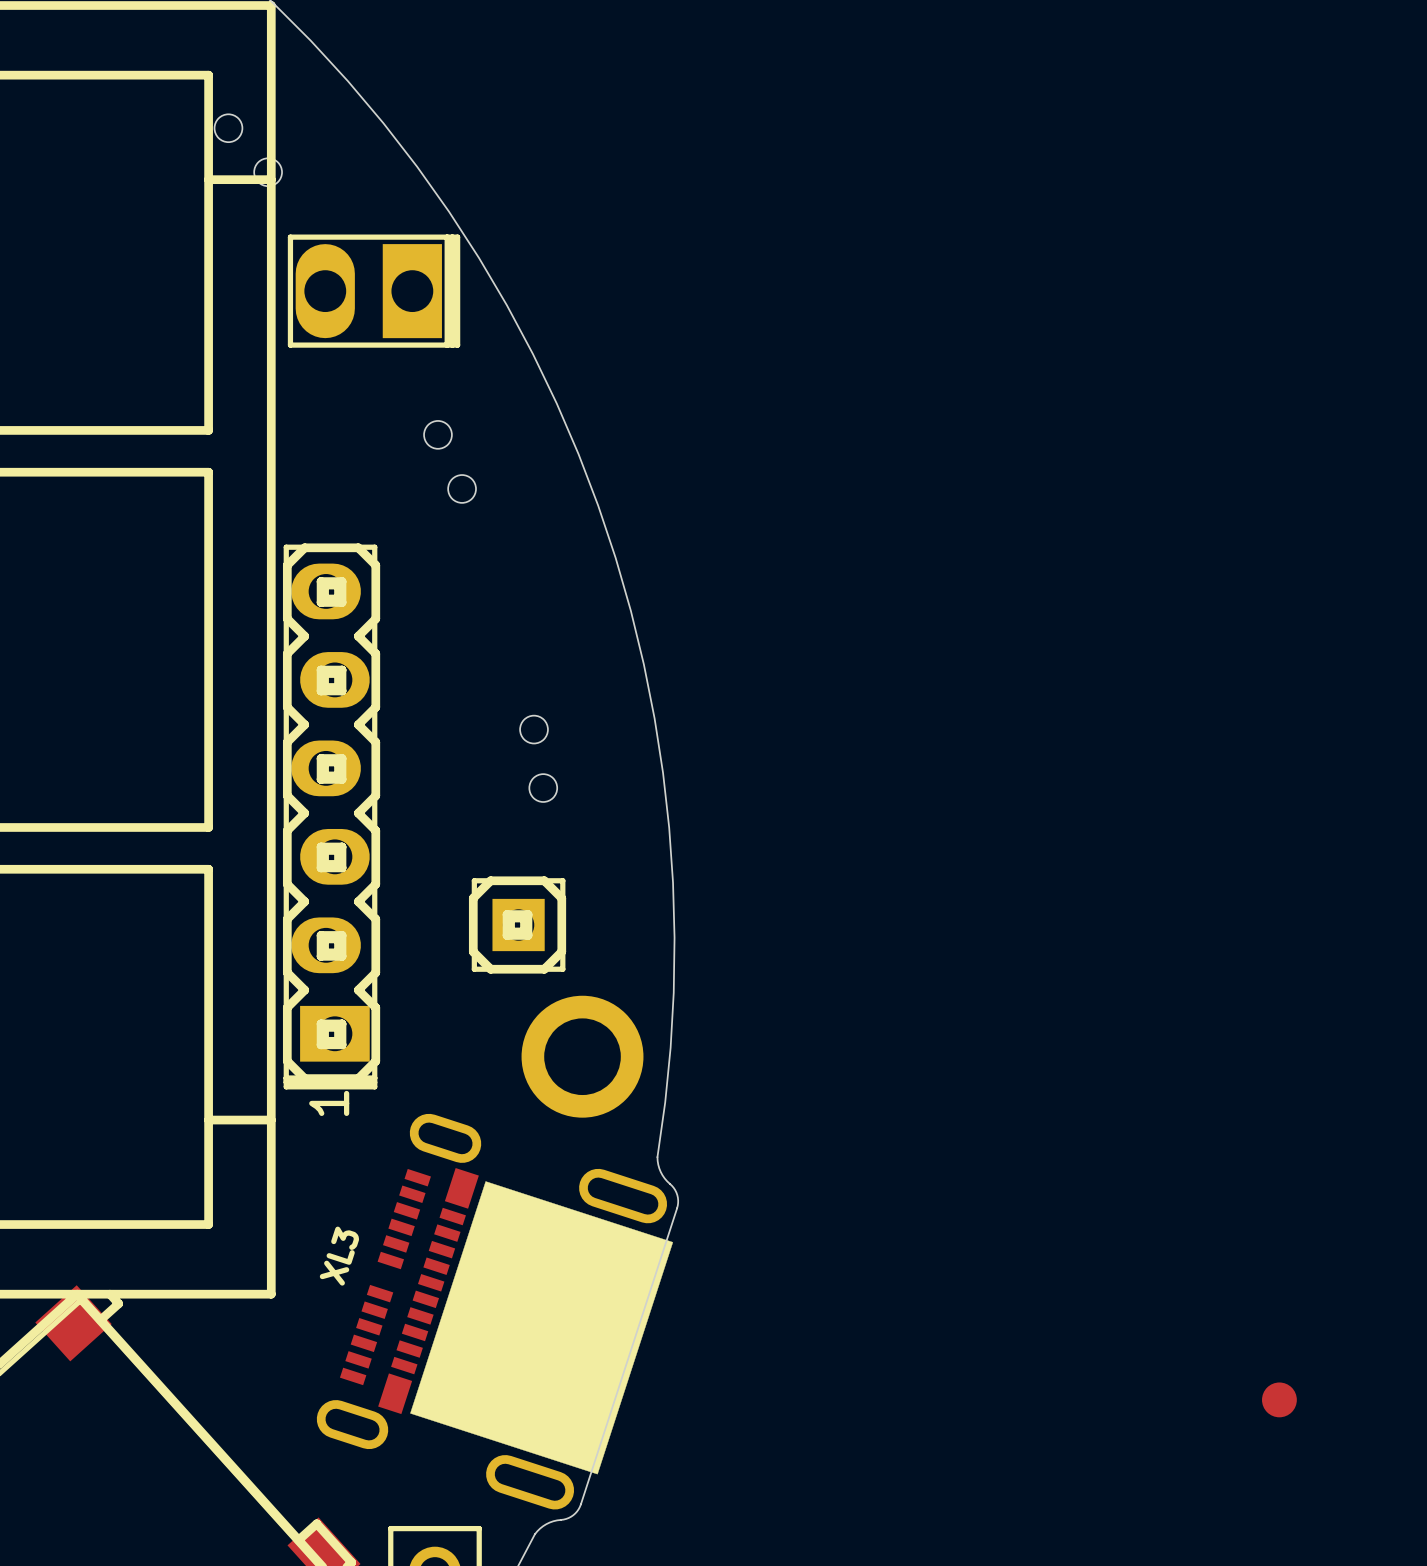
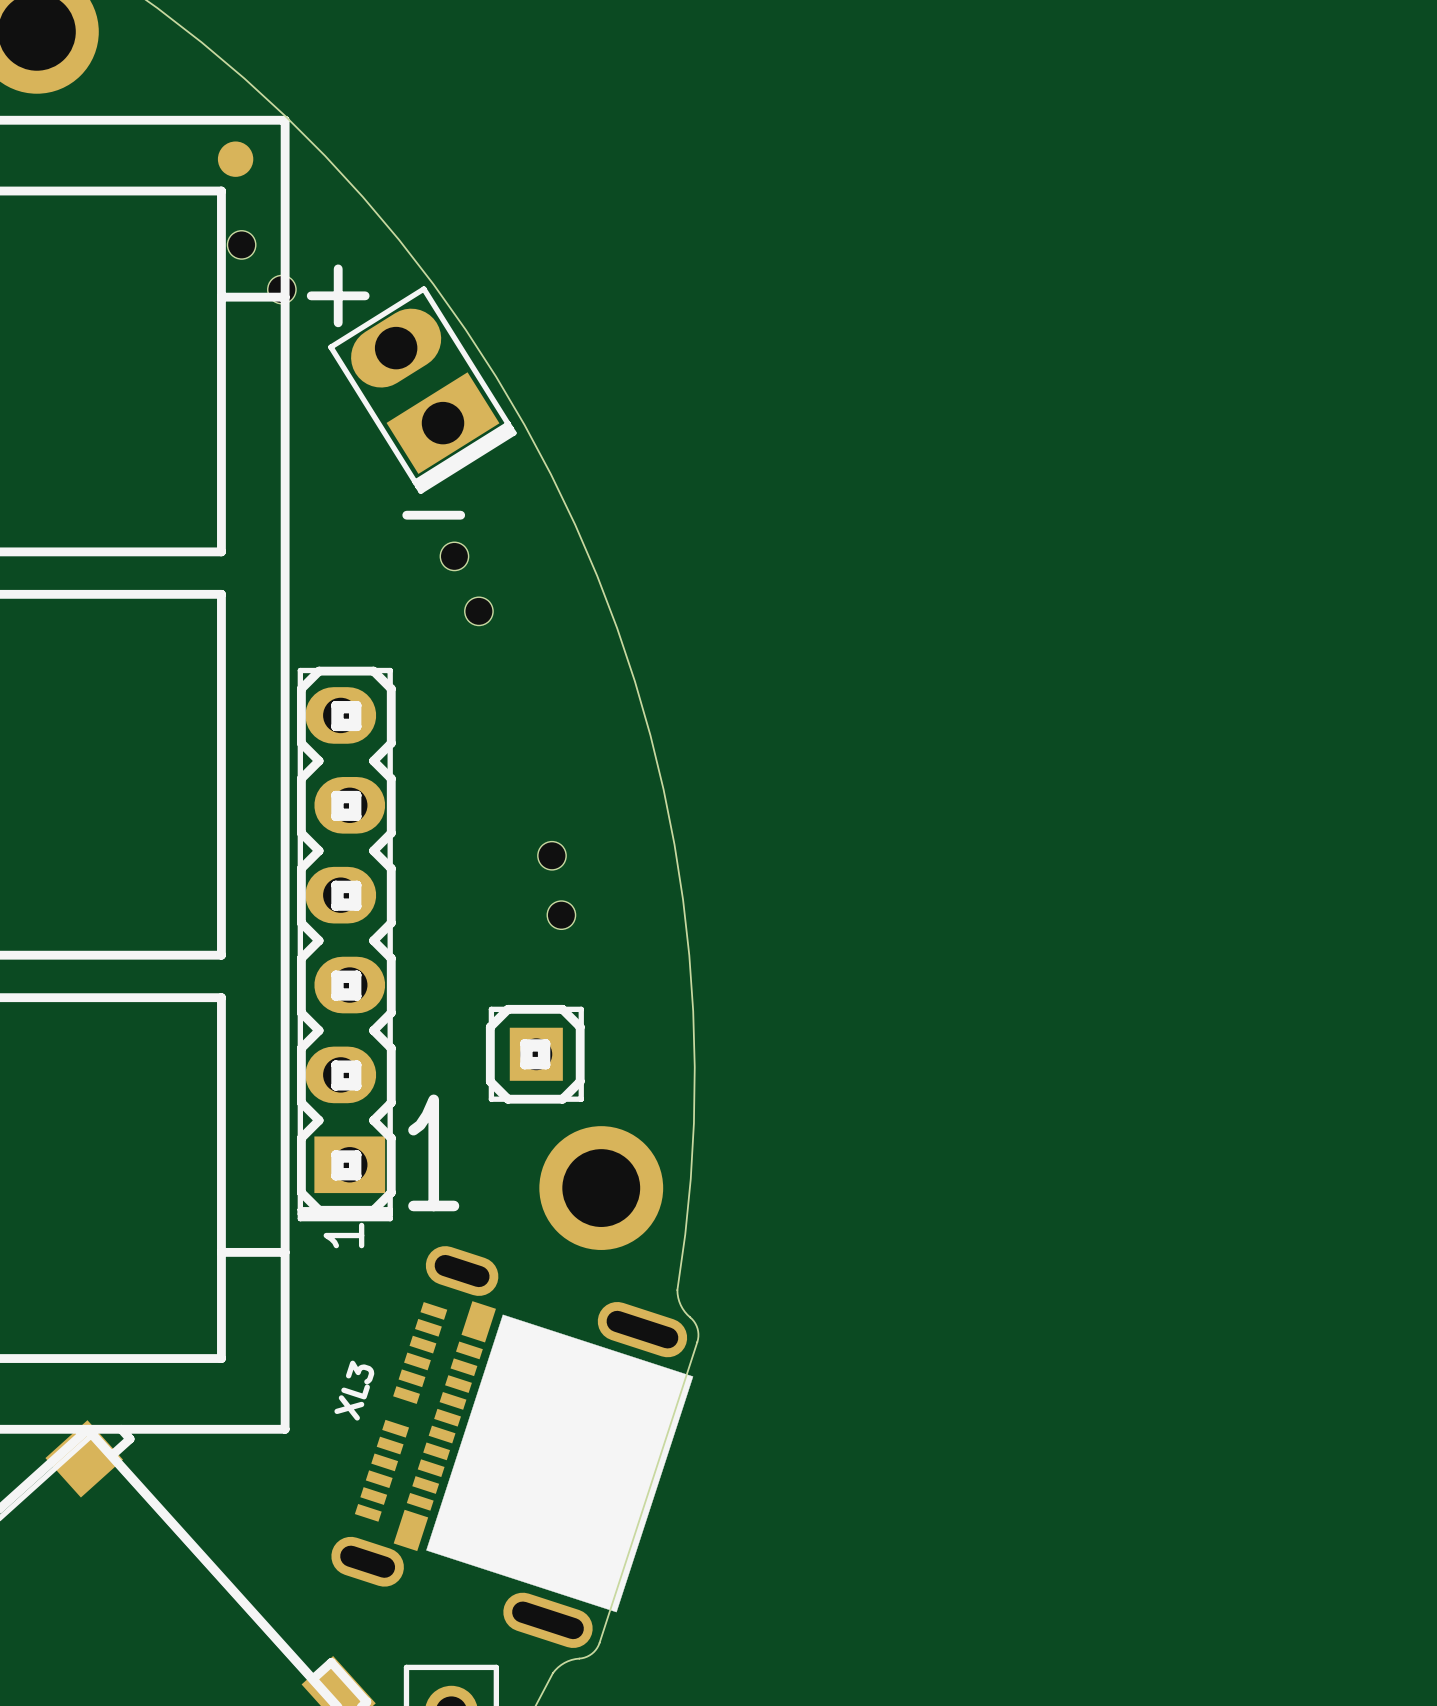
part: none -> (235, 159)
text: none -> + (338, 295)
part: none -> (422, 390)
part: (374, 291) -> none
text: none -> - (433, 515)
text: none -> 1 (433, 1152)
part: (1279, 1399) -> none

